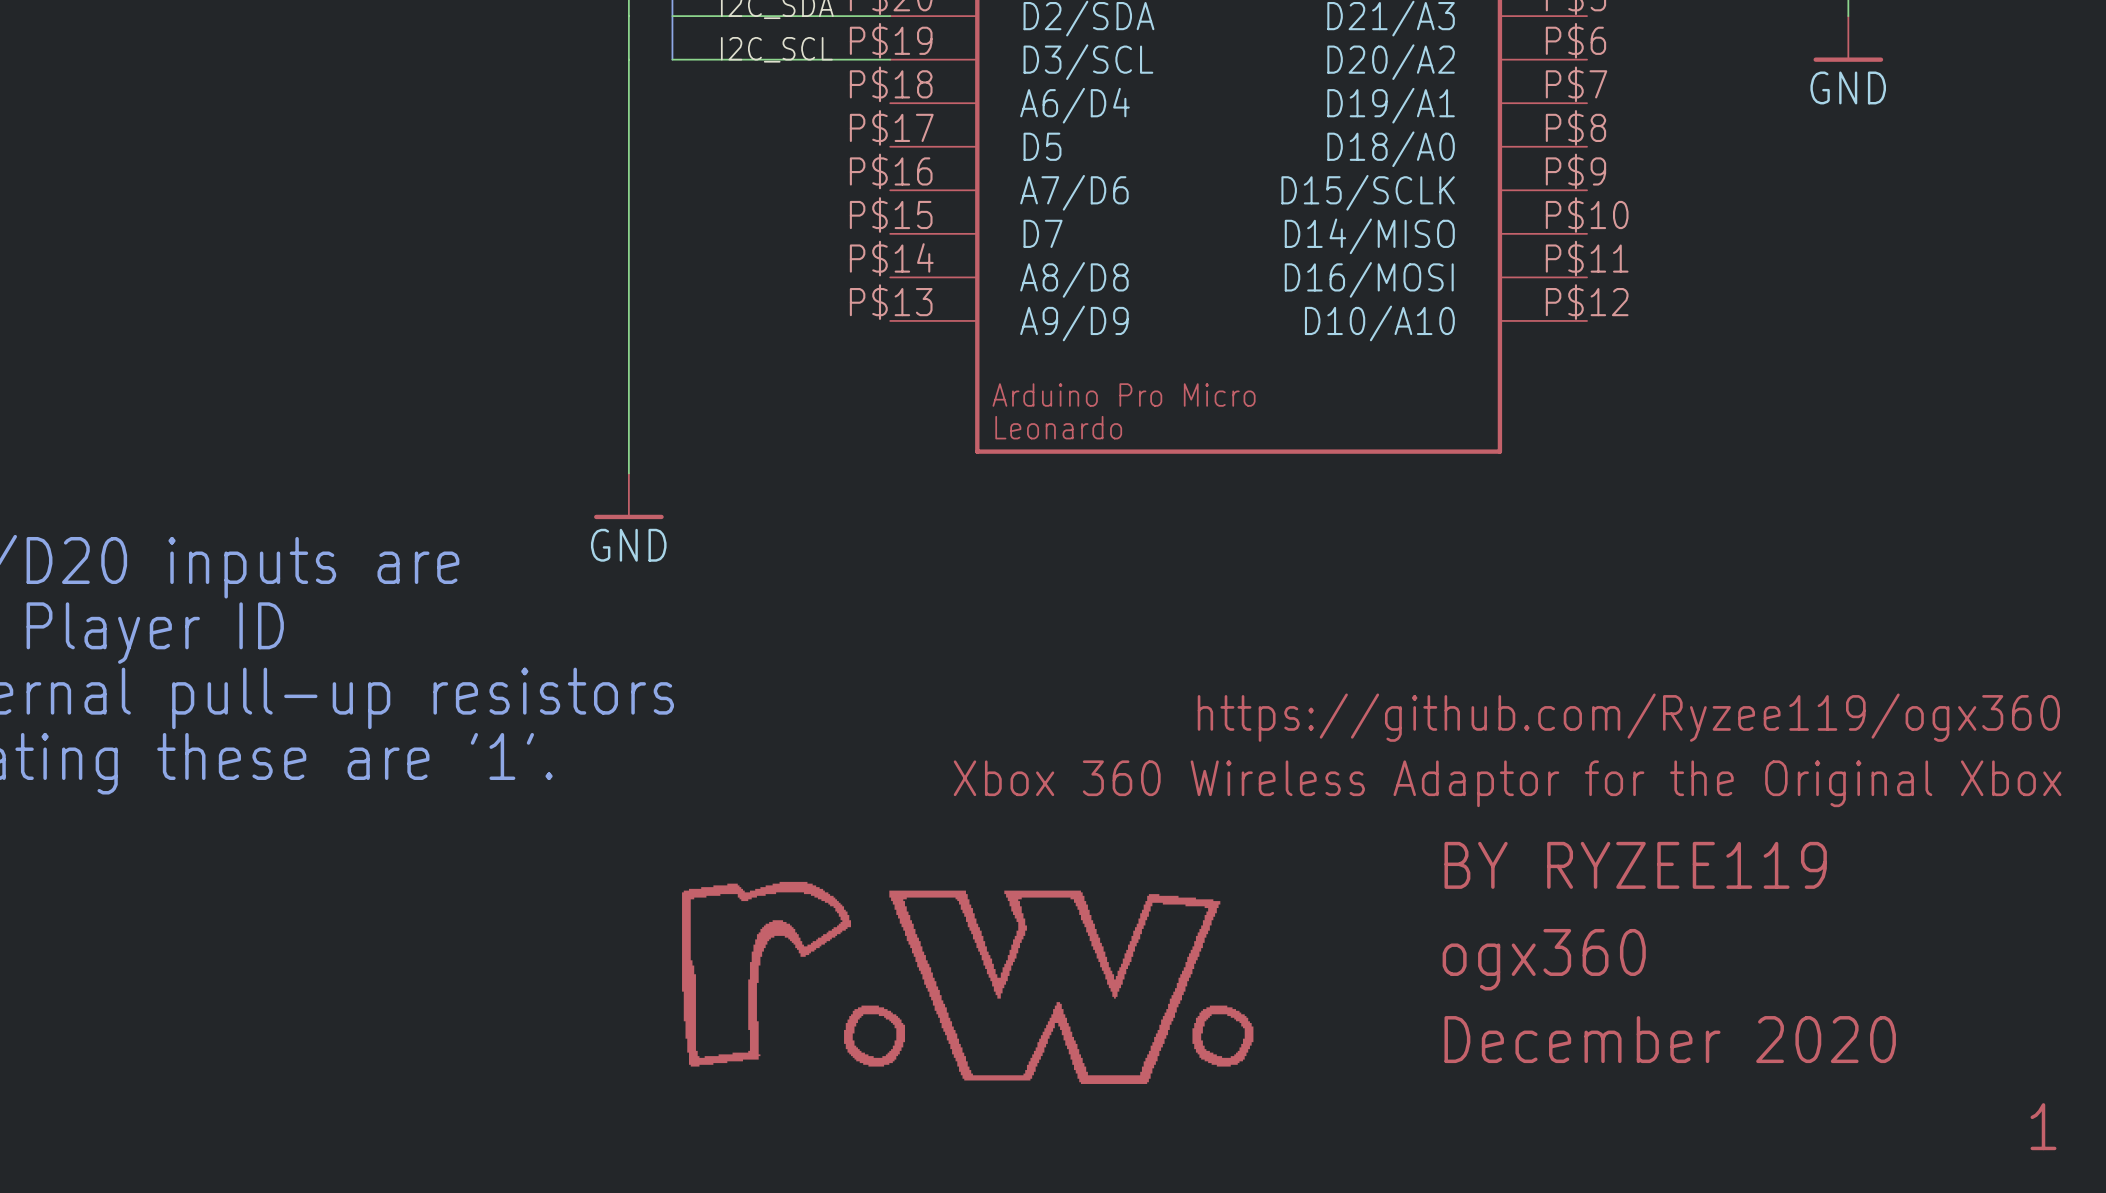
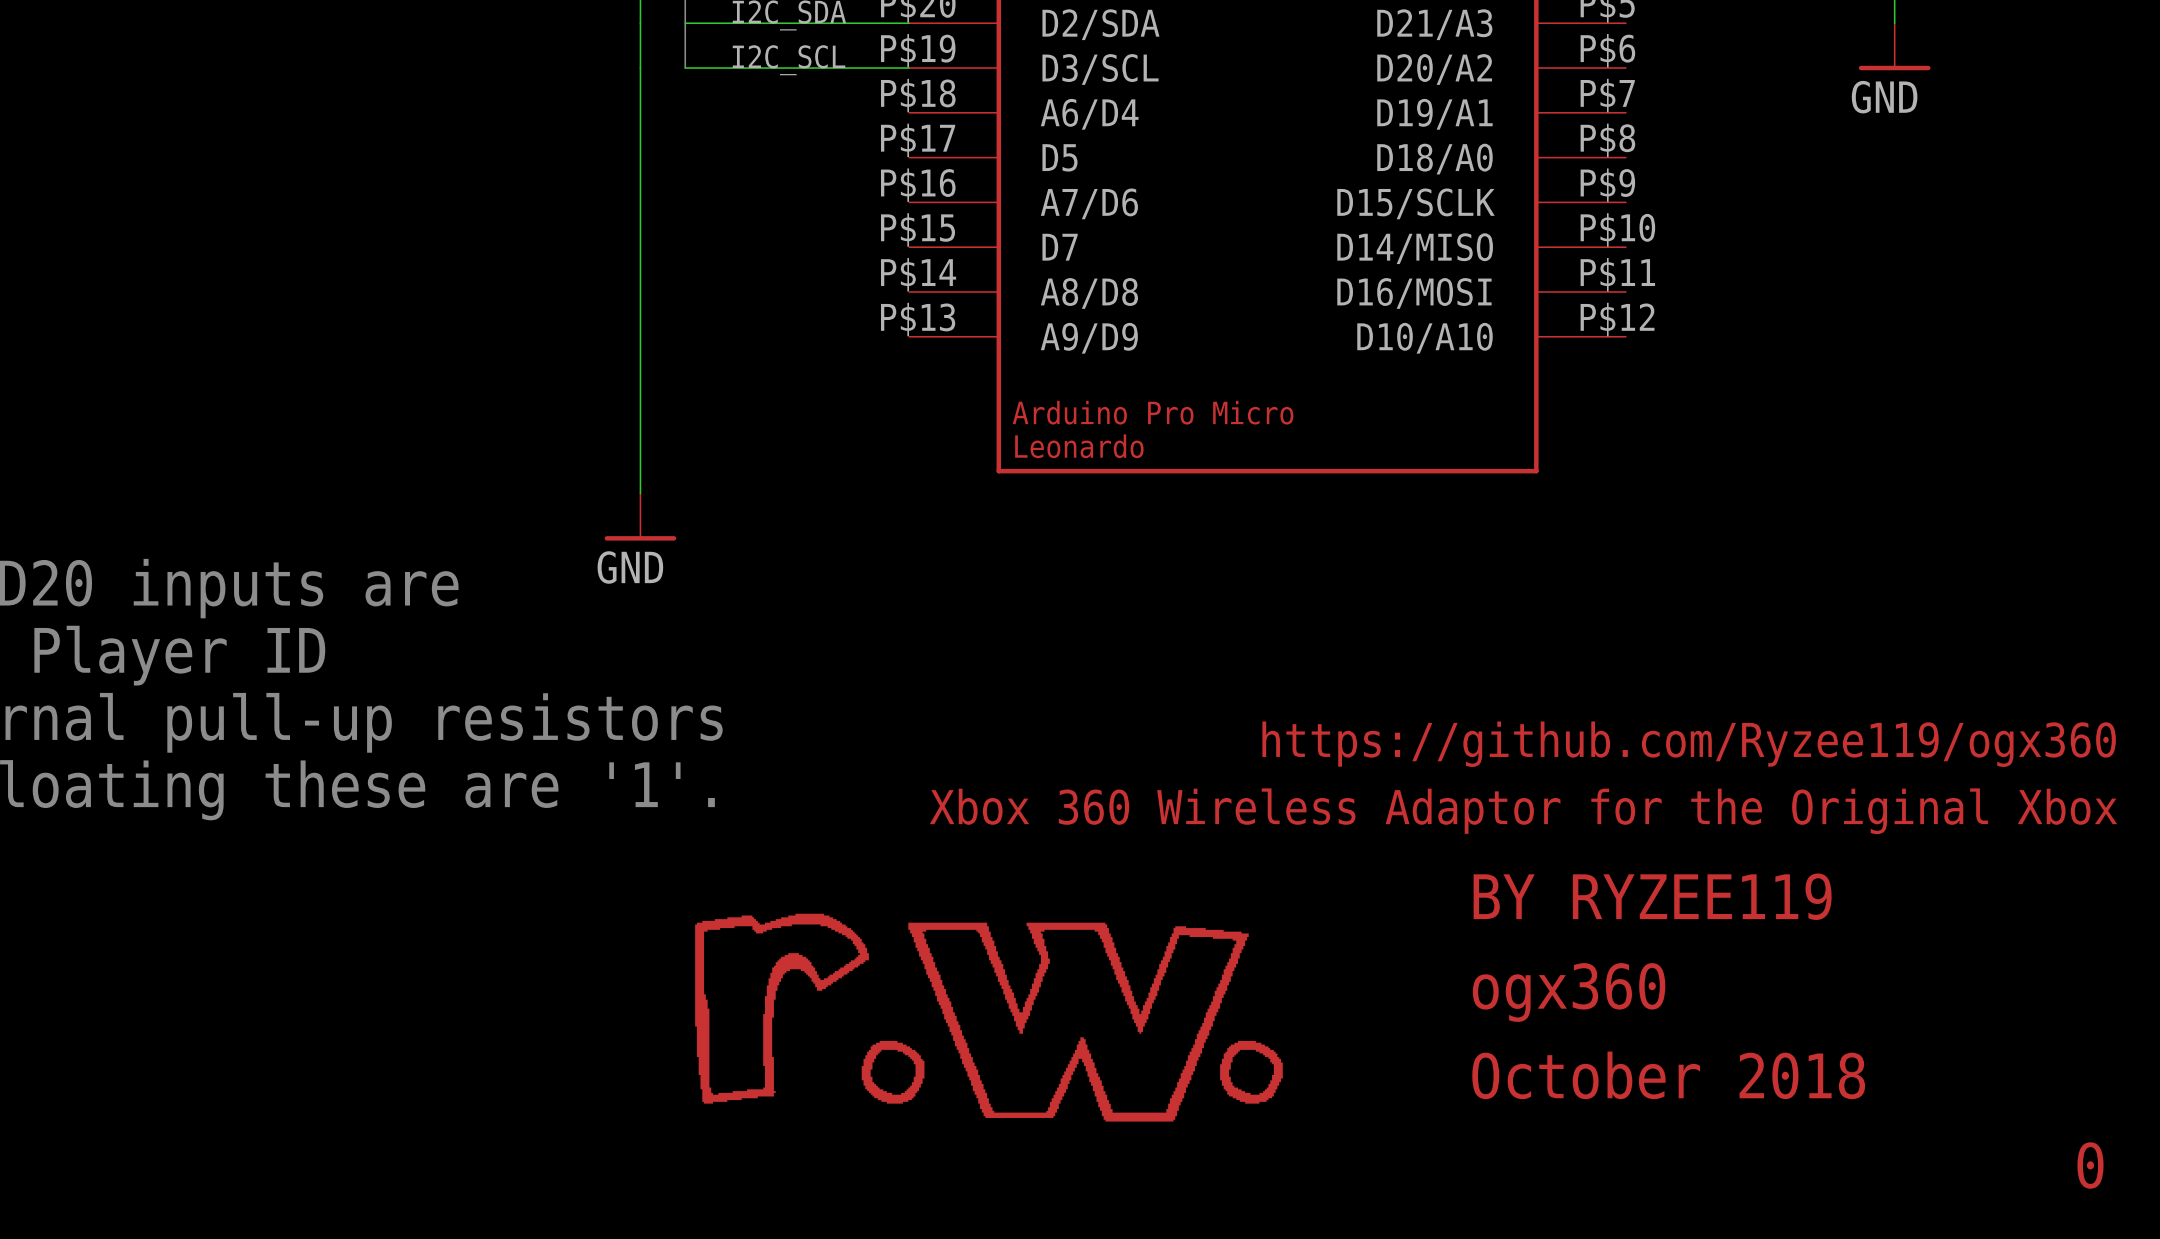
text: December 2020 (1670, 1039) -> October 2018 (1668, 1075)
text: 1 (2043, 1126) -> 0 (2090, 1165)

